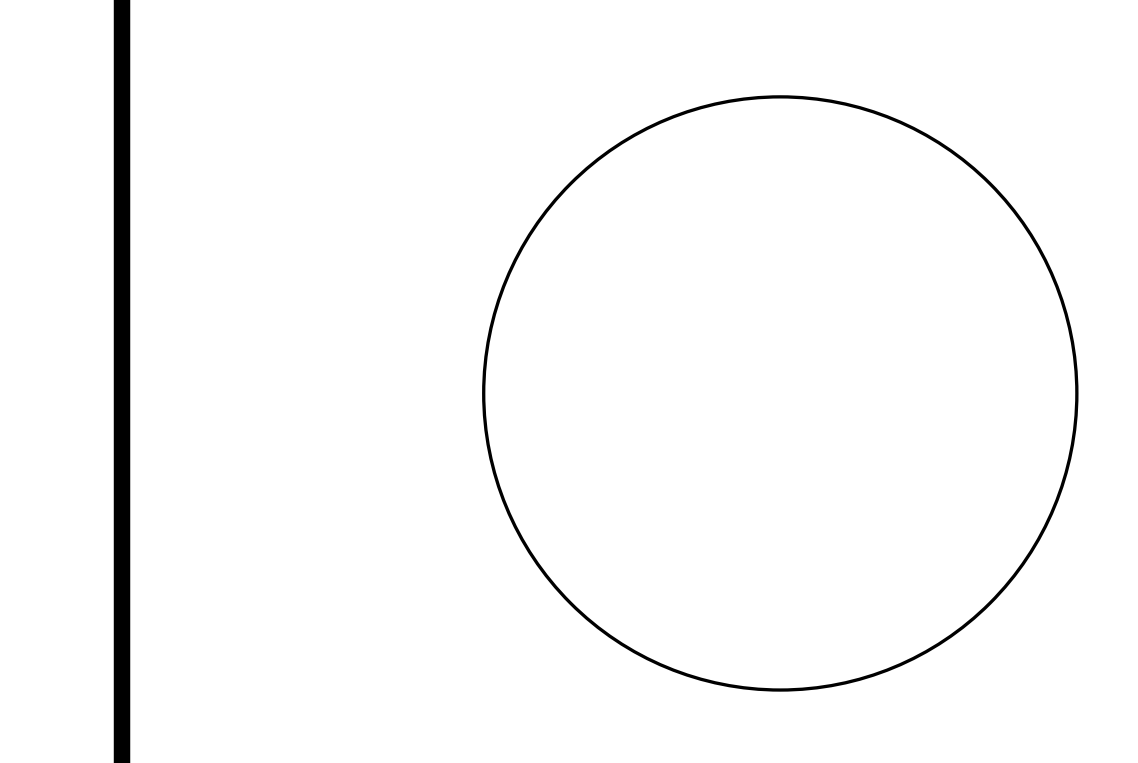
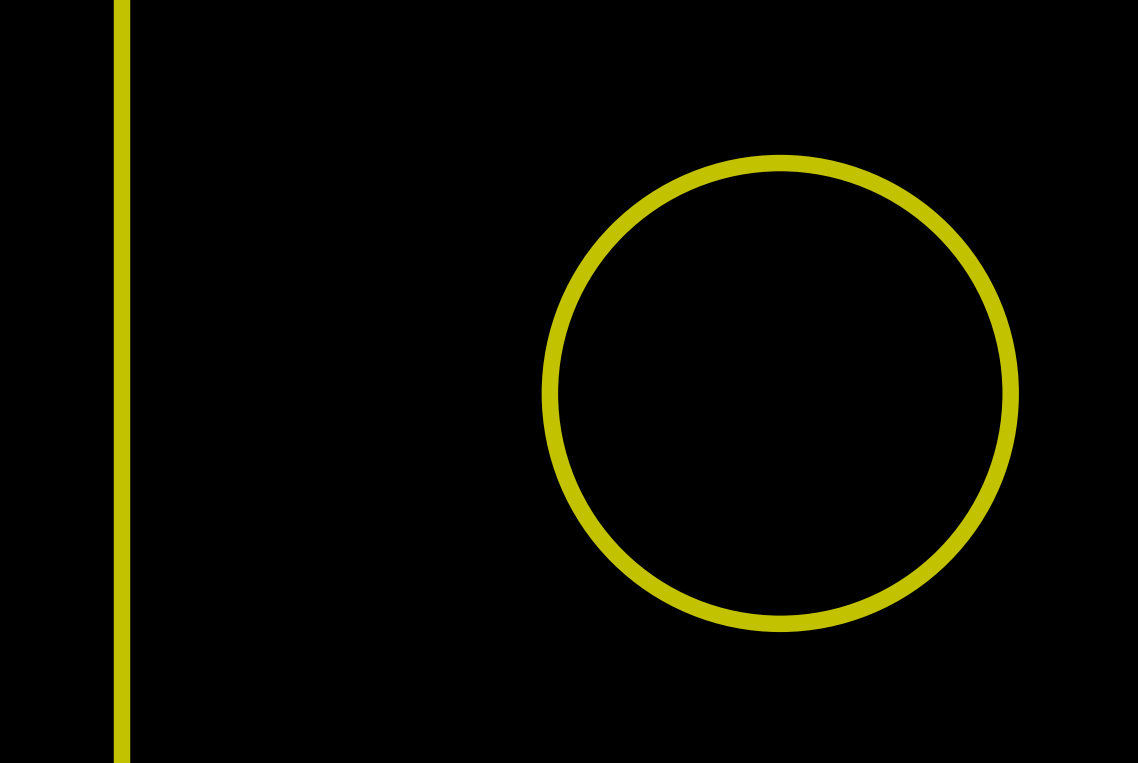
round board edge size: [482, 95, 1079, 692] -> [541, 154, 1019, 633]

